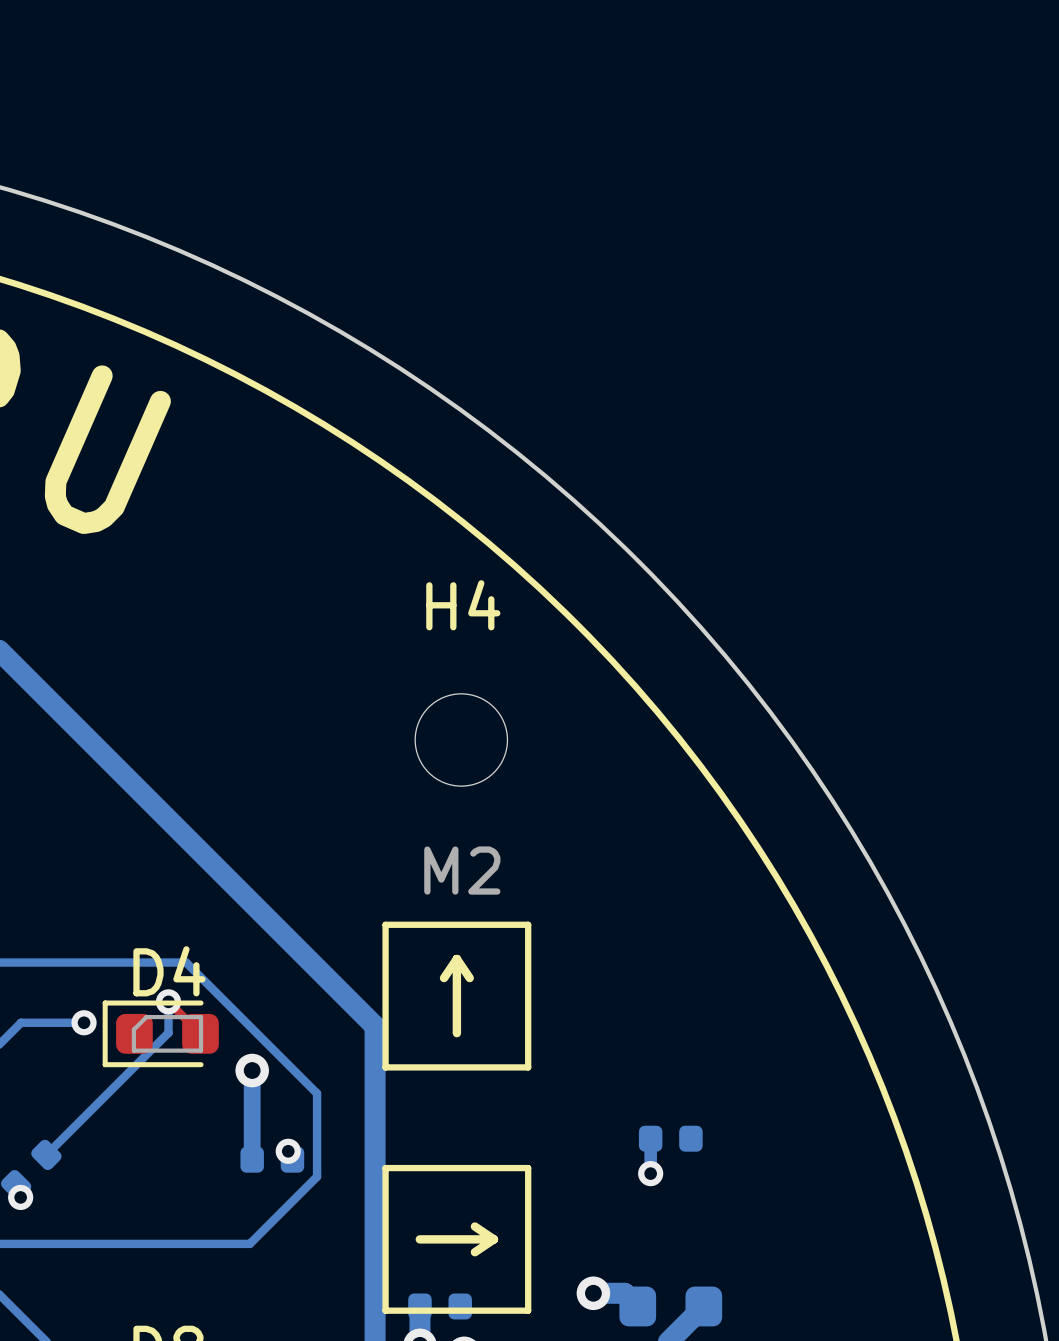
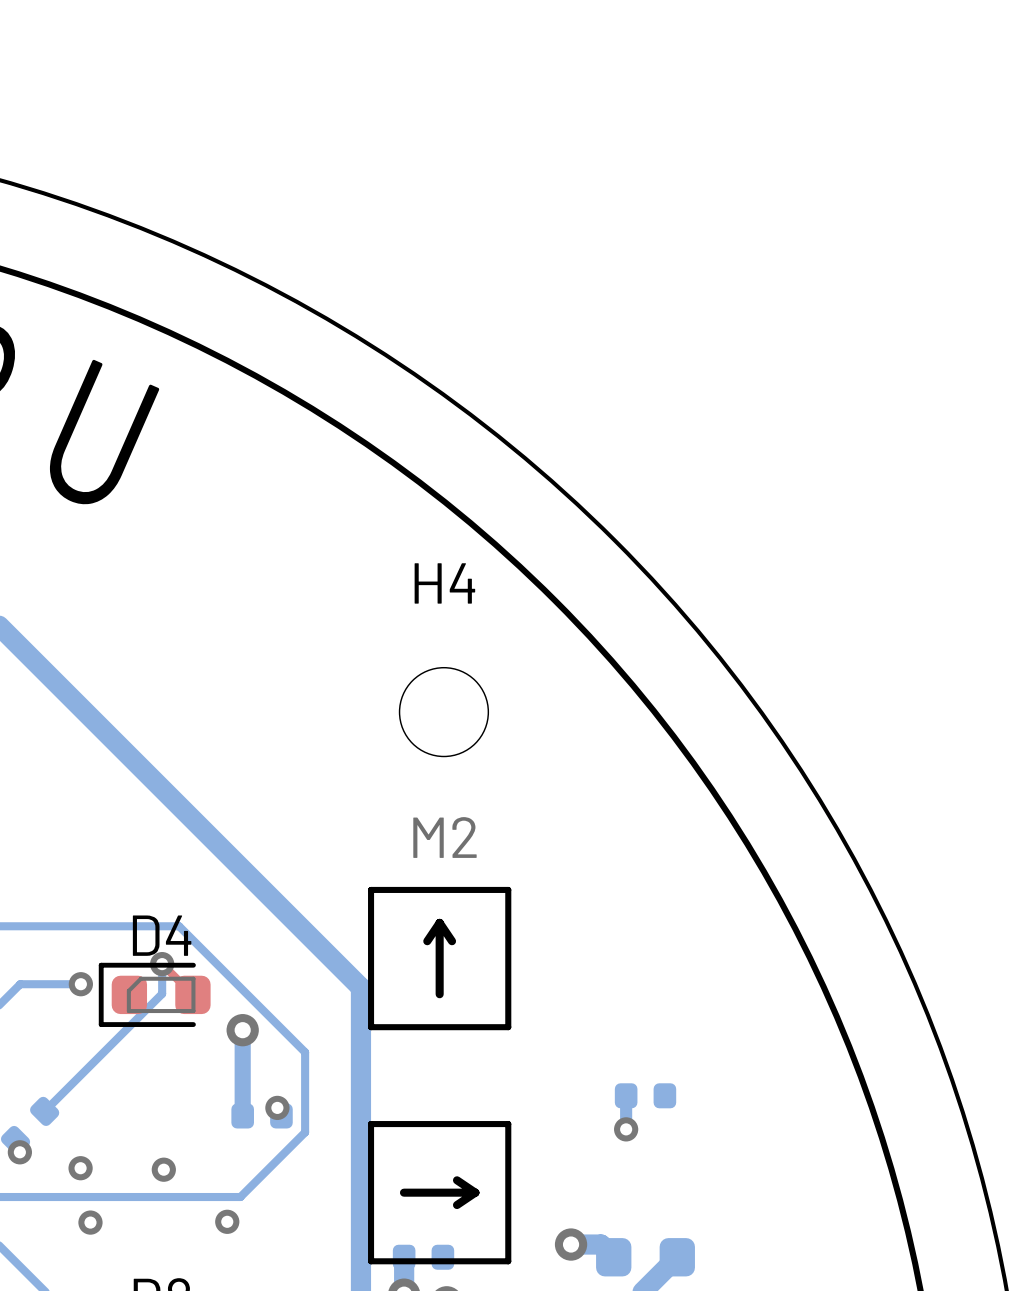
via: none -> (80, 1168)
via: none -> (163, 1169)
via: none -> (227, 1221)
via: none -> (90, 1222)

